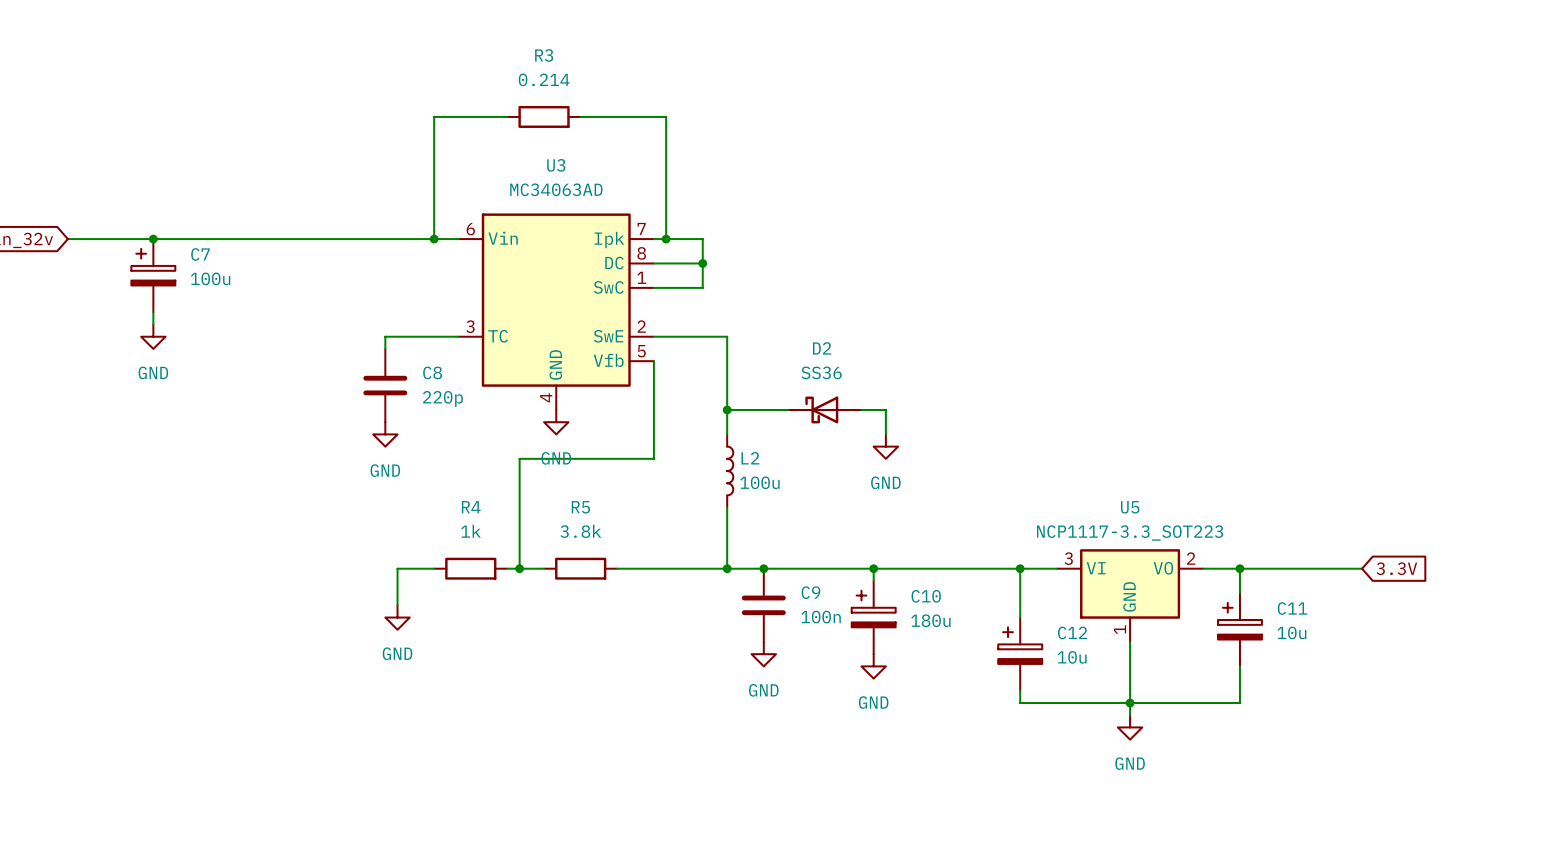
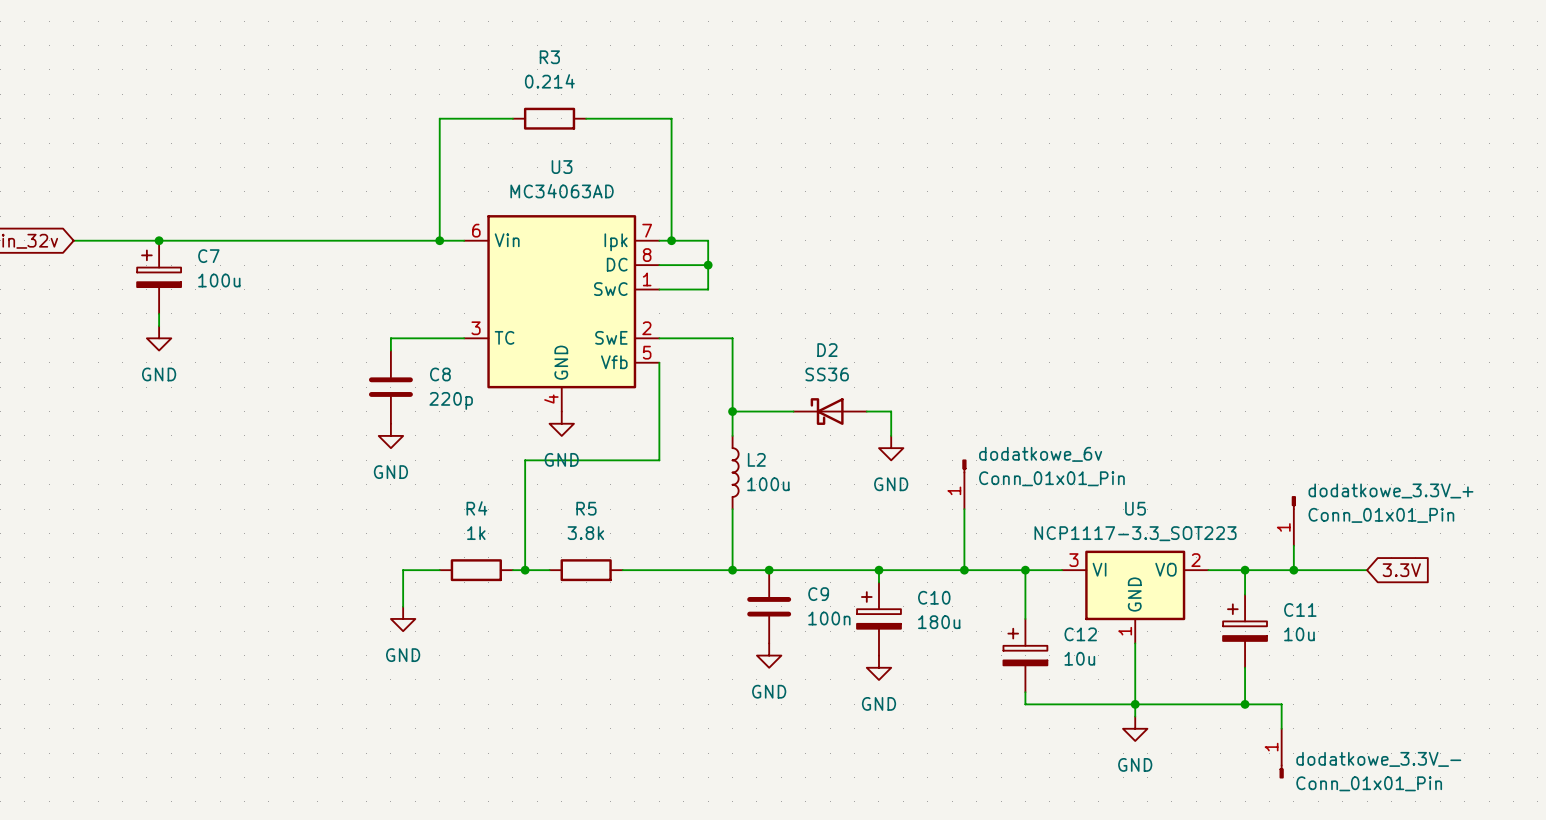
dodatkowe_6v: none -> Conn_01x01_Pin (964, 484)
wire: none -> (964, 509) (964, 570)
dodatkowe_3.3V_+: none -> Conn_01x01_Pin (1293, 520)
wire: none -> (1293, 545) (1293, 570)
junction: none -> (964, 570)
junction: none -> (1293, 570)
wire: none -> (1245, 704) (1281, 704) (1281, 728)
junction: none -> (1245, 704)
dodatkowe_3.3V_-: none -> Conn_01x01_Pin (1281, 753)

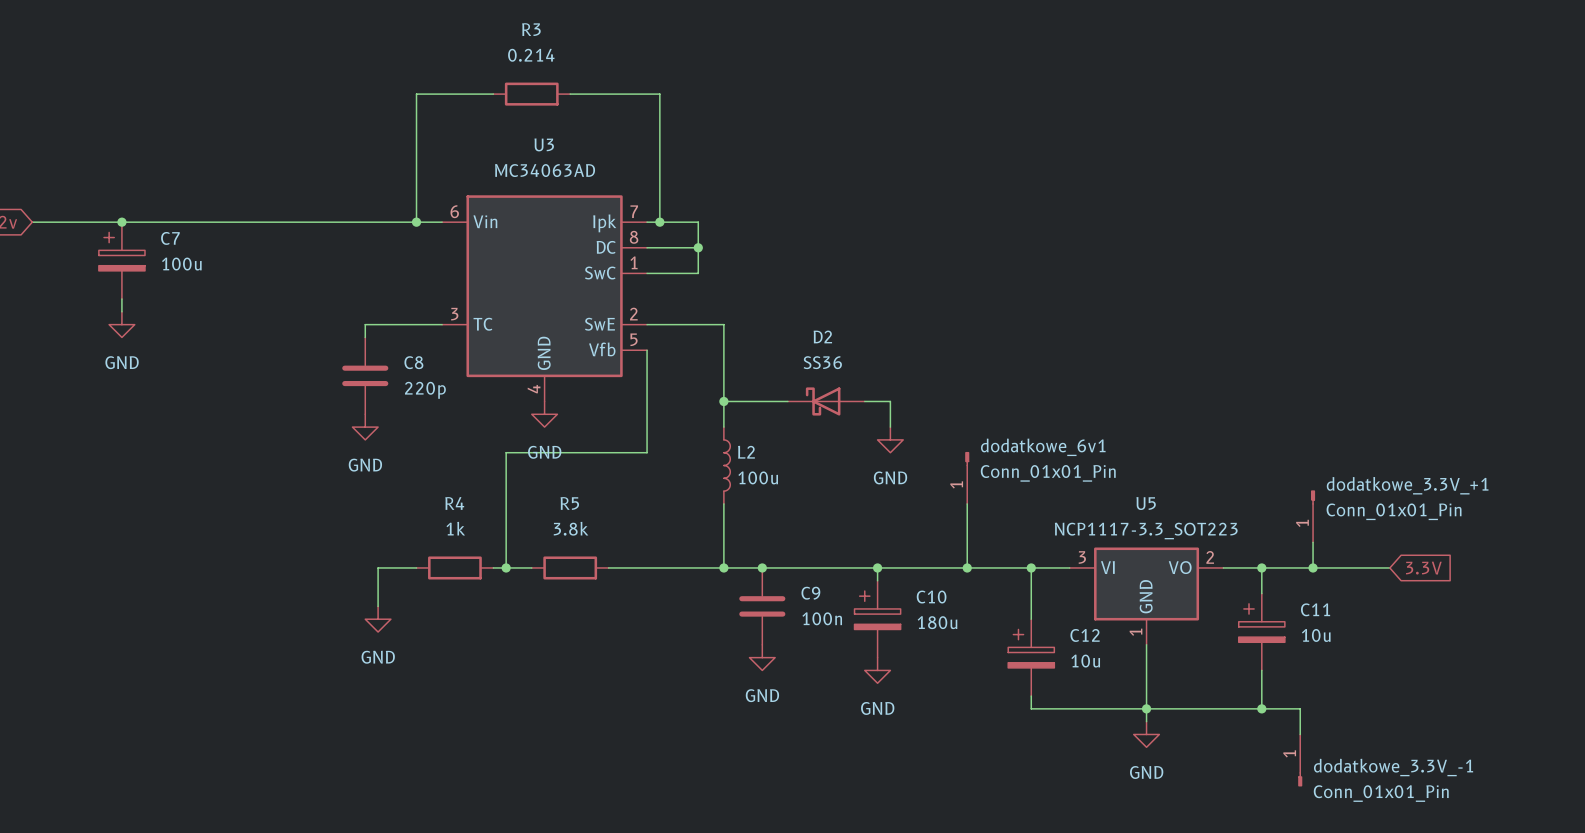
dodatkowe_6v name: dodatkowe_6v (1040, 454) -> dodatkowe_6v1 (1043, 447)
dodatkowe_3.3V_+ name: dodatkowe_3.3V_+ (1390, 490) -> dodatkowe_3.3V_+1 (1407, 485)
dodatkowe_3.3V_- name: dodatkowe_3.3V_- (1378, 759) -> dodatkowe_3.3V_-1 (1393, 767)

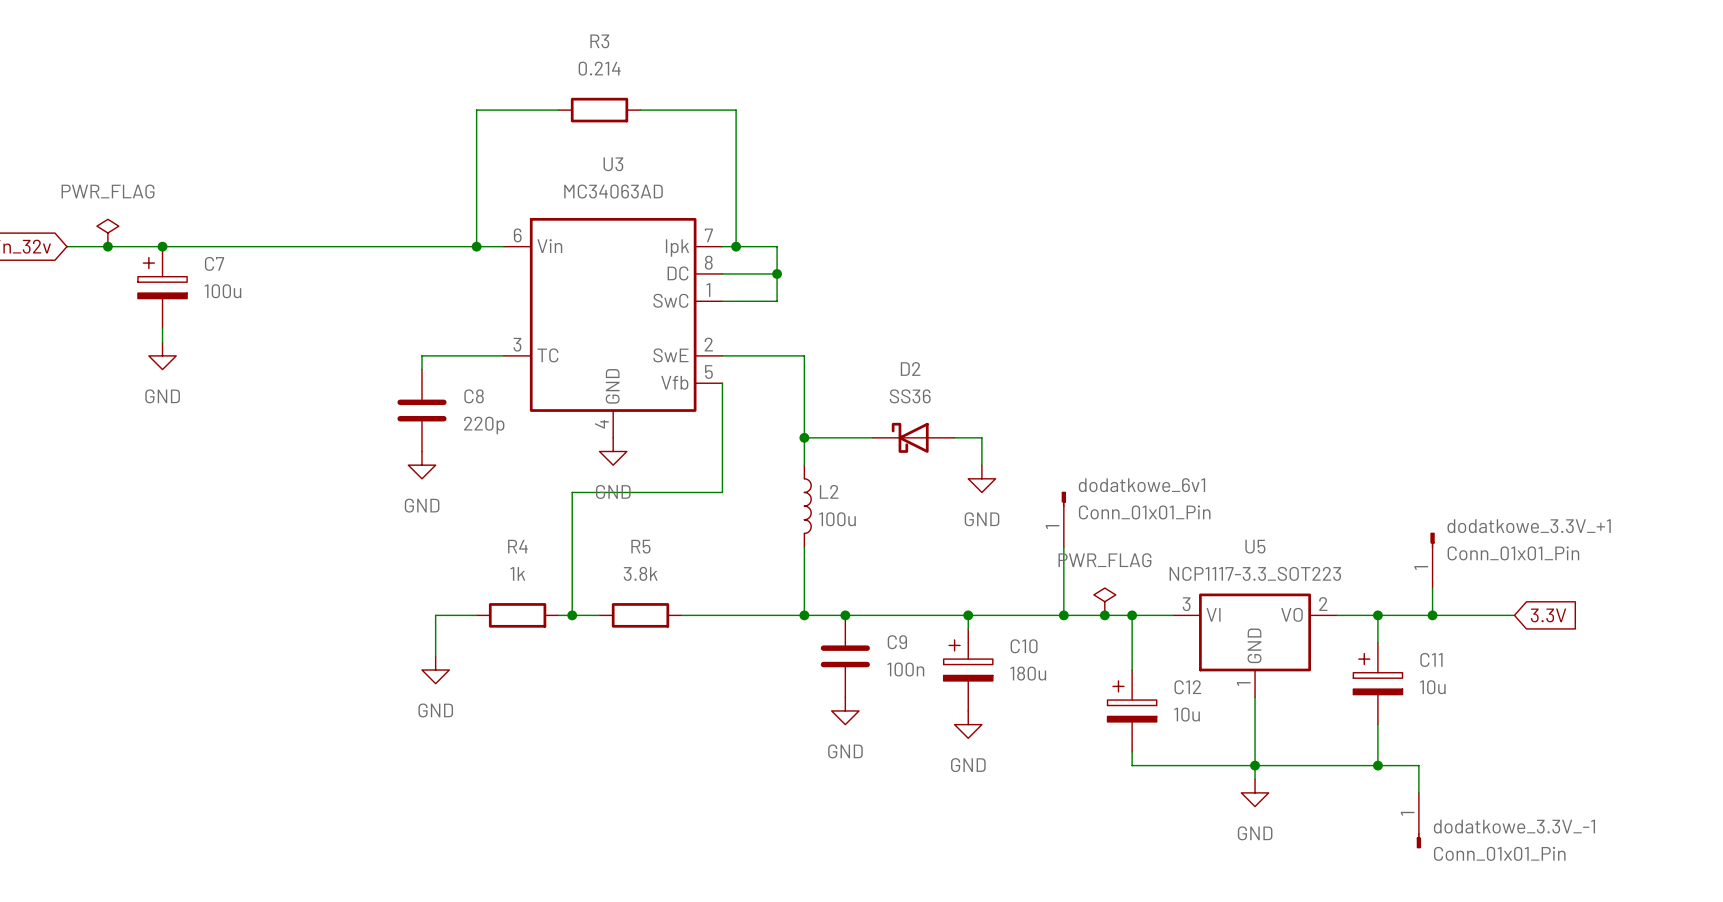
power symbol: none -> PWR_FLAG (107, 233)
junction: none -> (107, 246)
power symbol: none -> PWR_FLAG (1104, 601)
junction: none -> (1104, 615)

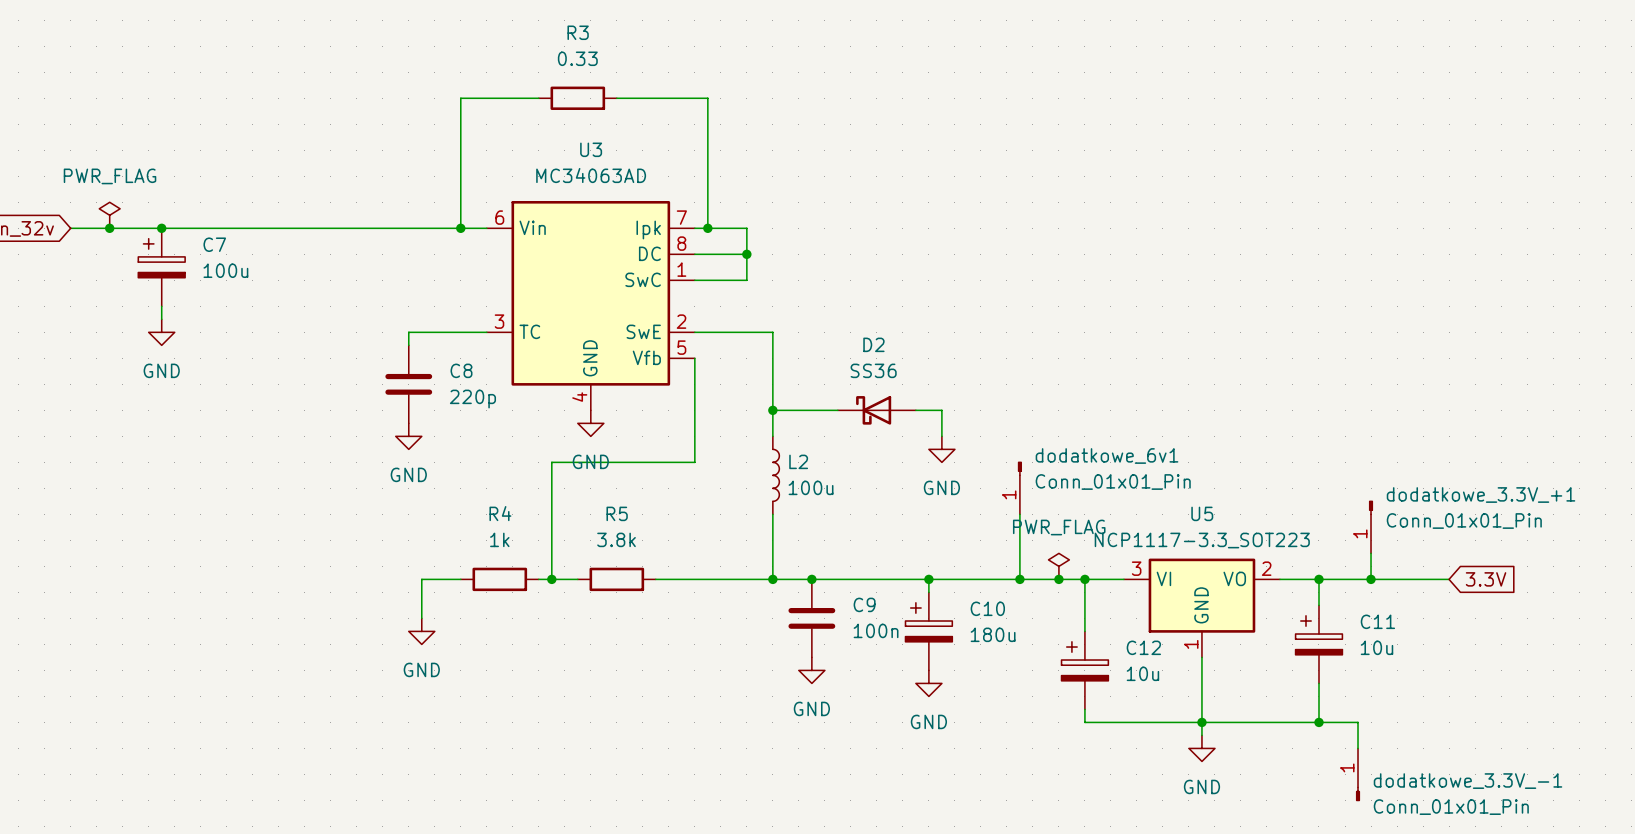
R3 value: 0.214 (599, 68) -> 0.33 (577, 58)

